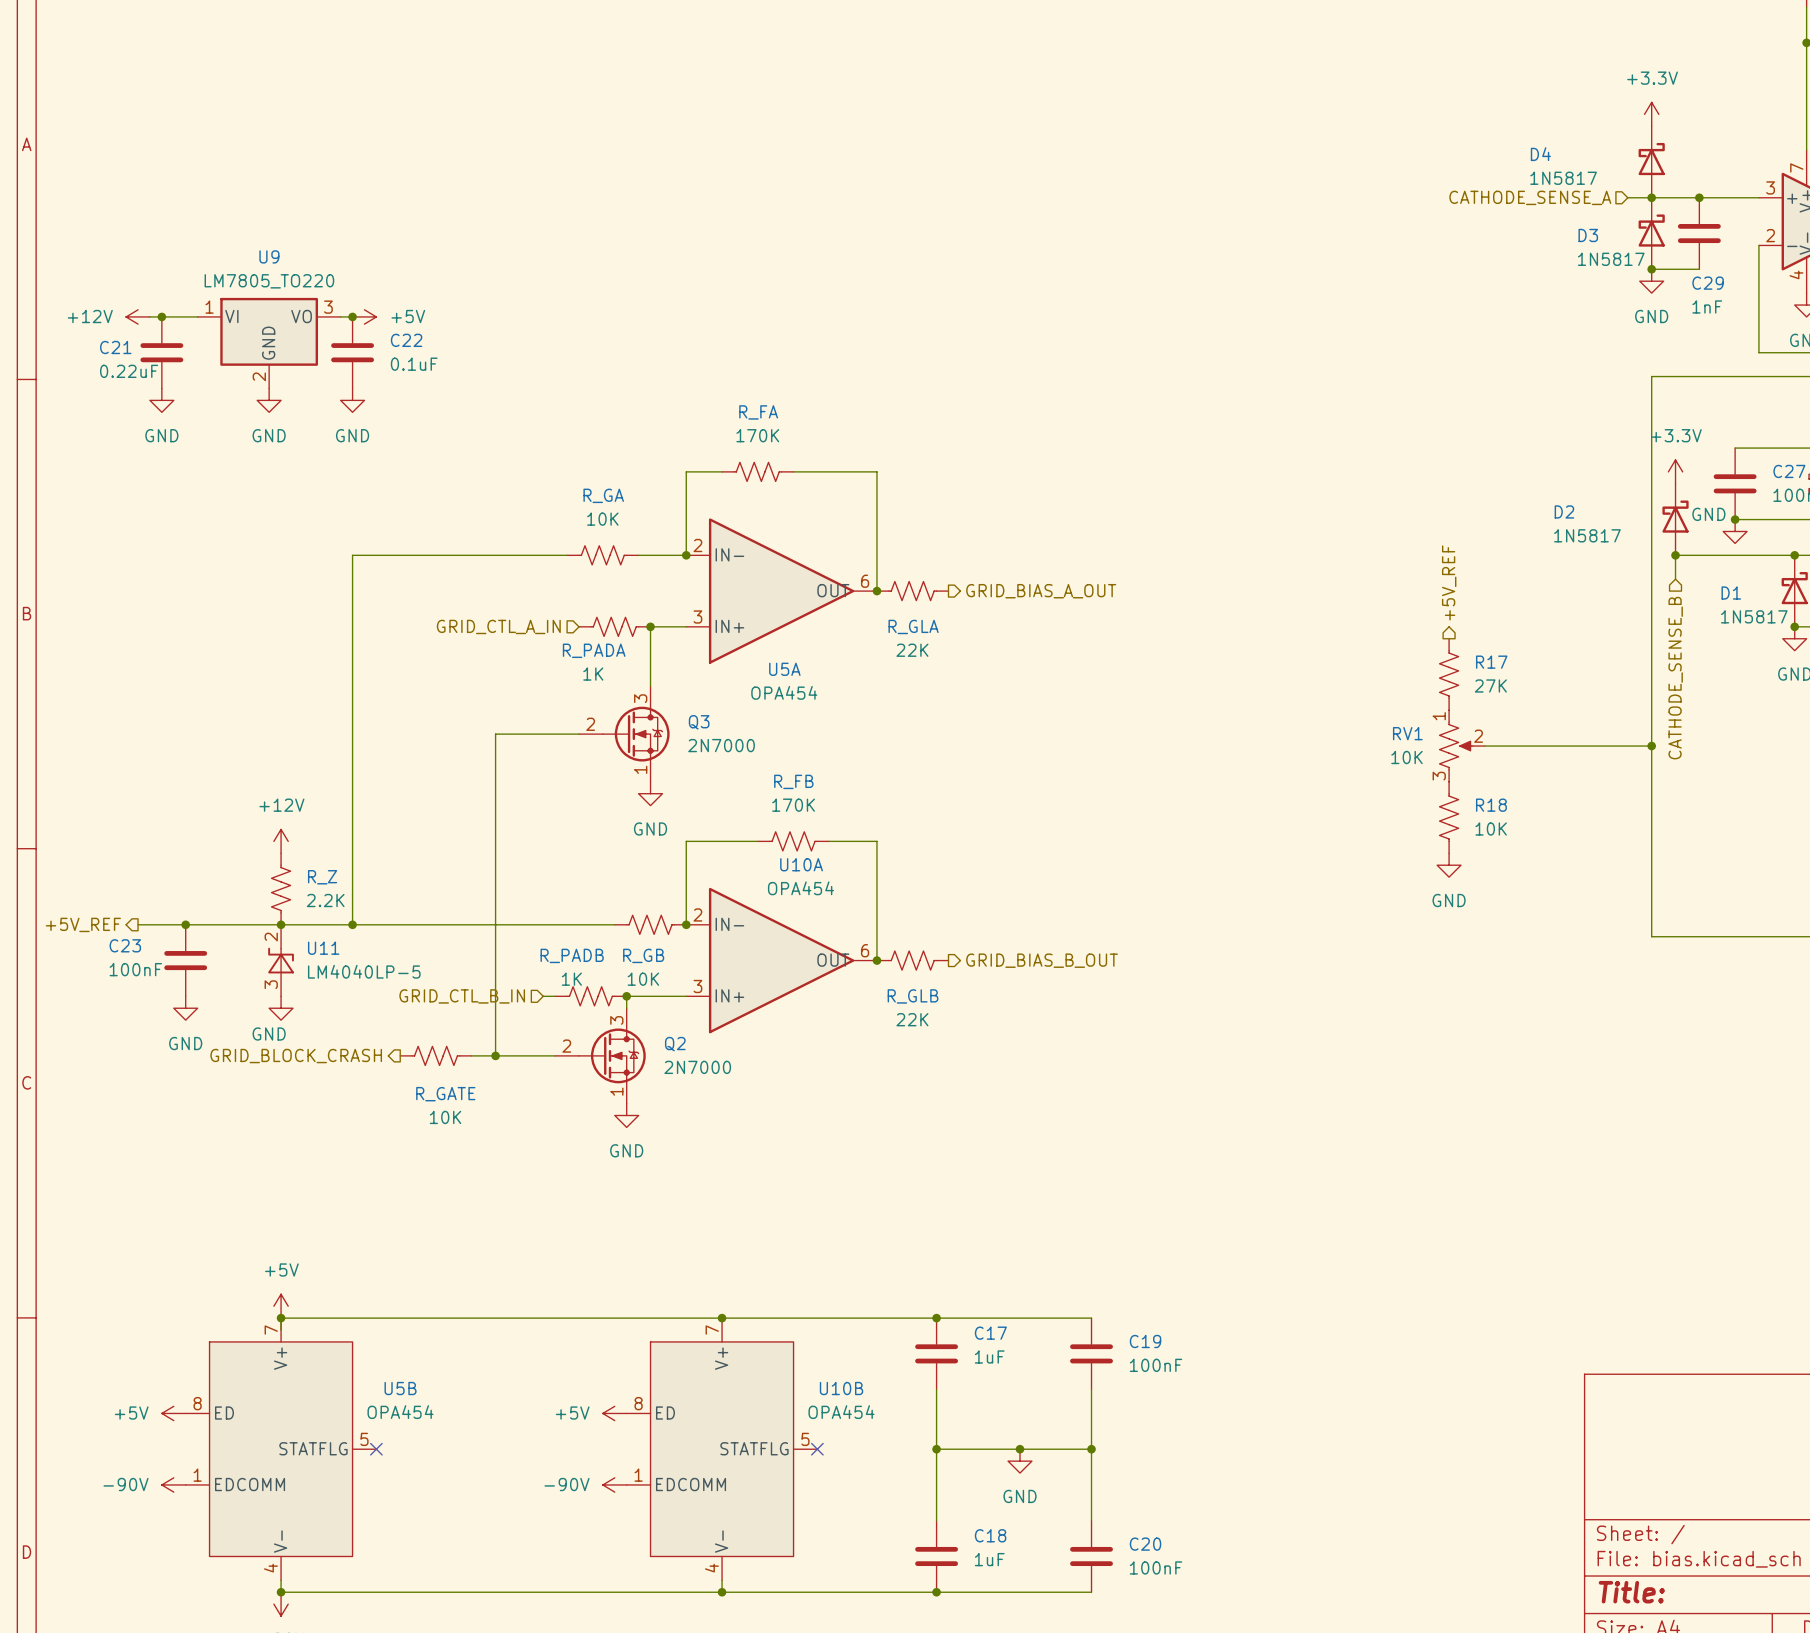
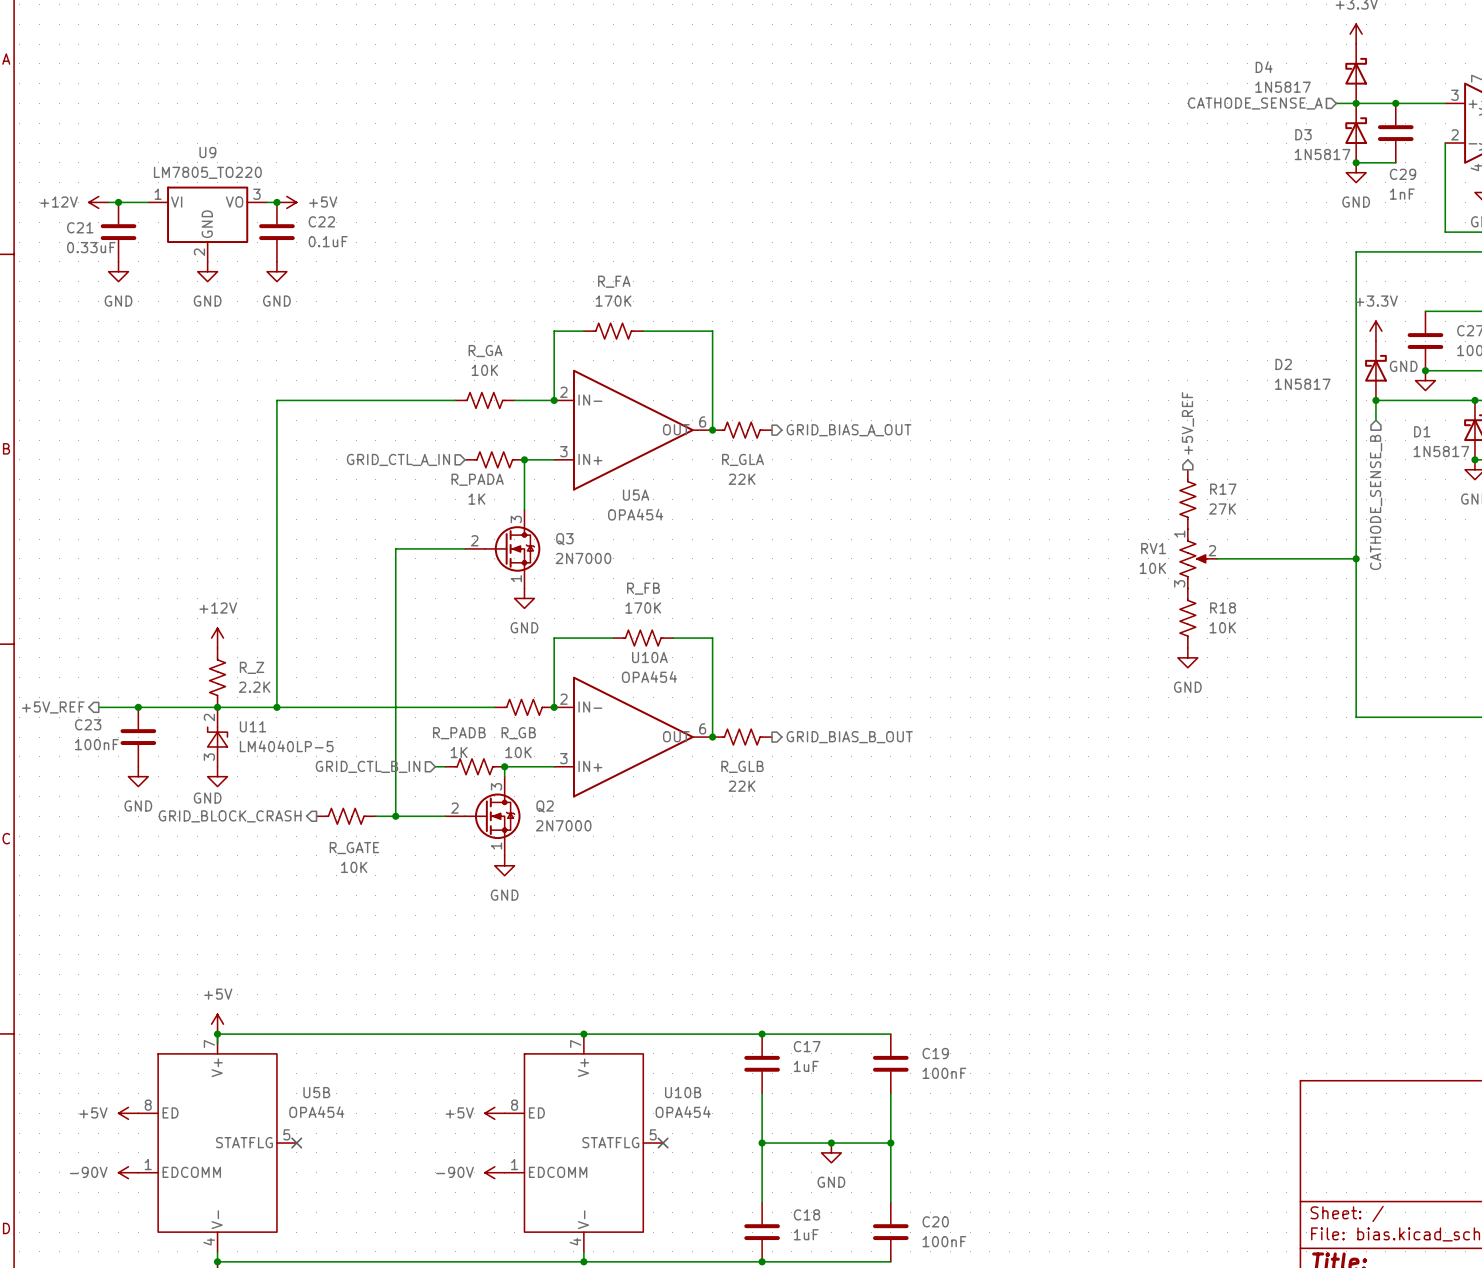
C21 value: 0.22uF (129, 371) -> 0.33uF (91, 247)

